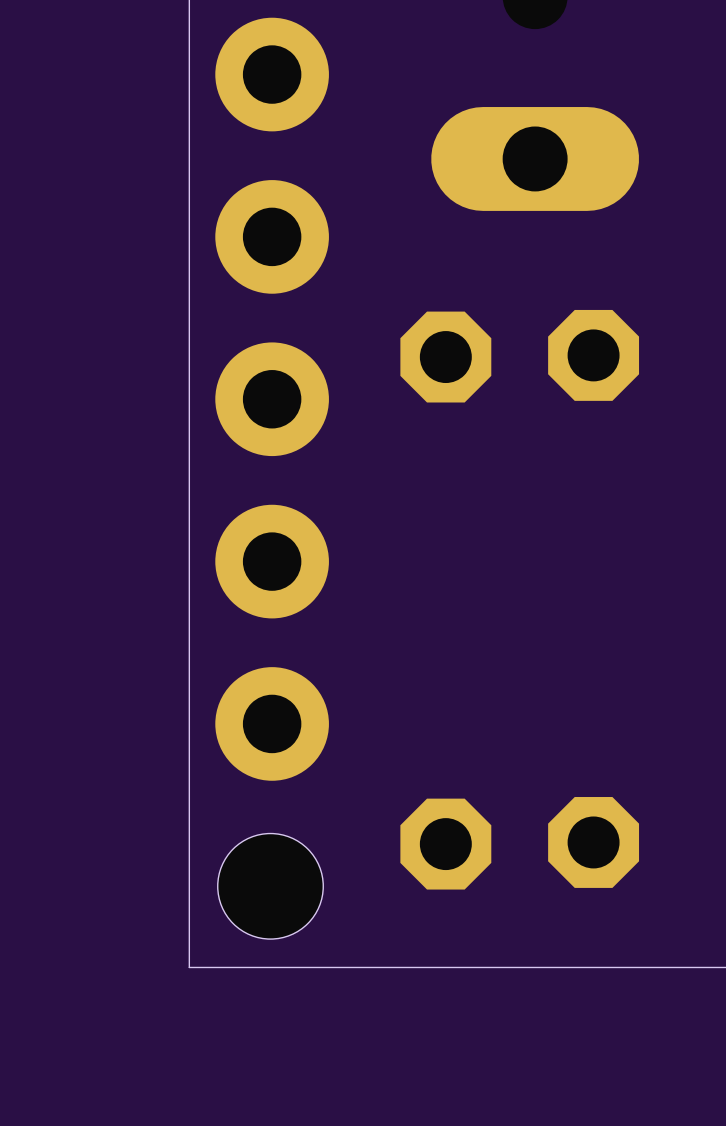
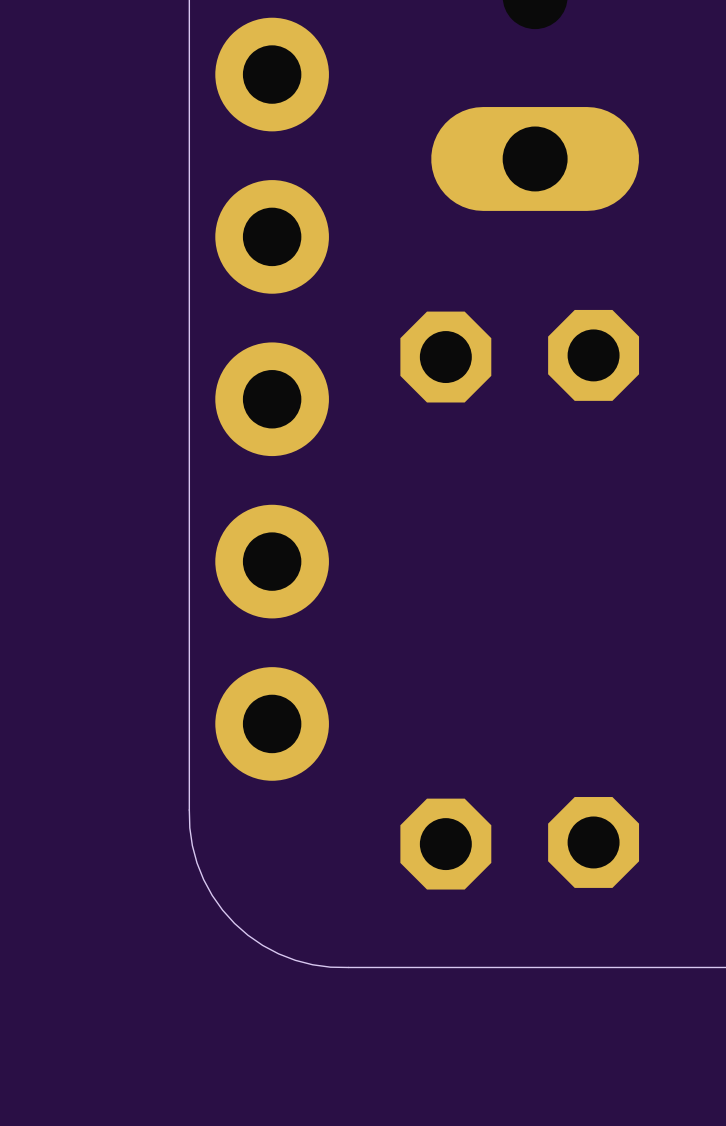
board edge: (189, 809) (189, 967) (348, 967) -> (189, 809) (192, 845) (197, 863) (212, 895) (234, 923) (262, 945) (295, 960) (330, 967) (348, 967)
hole: (270, 886) -> none

